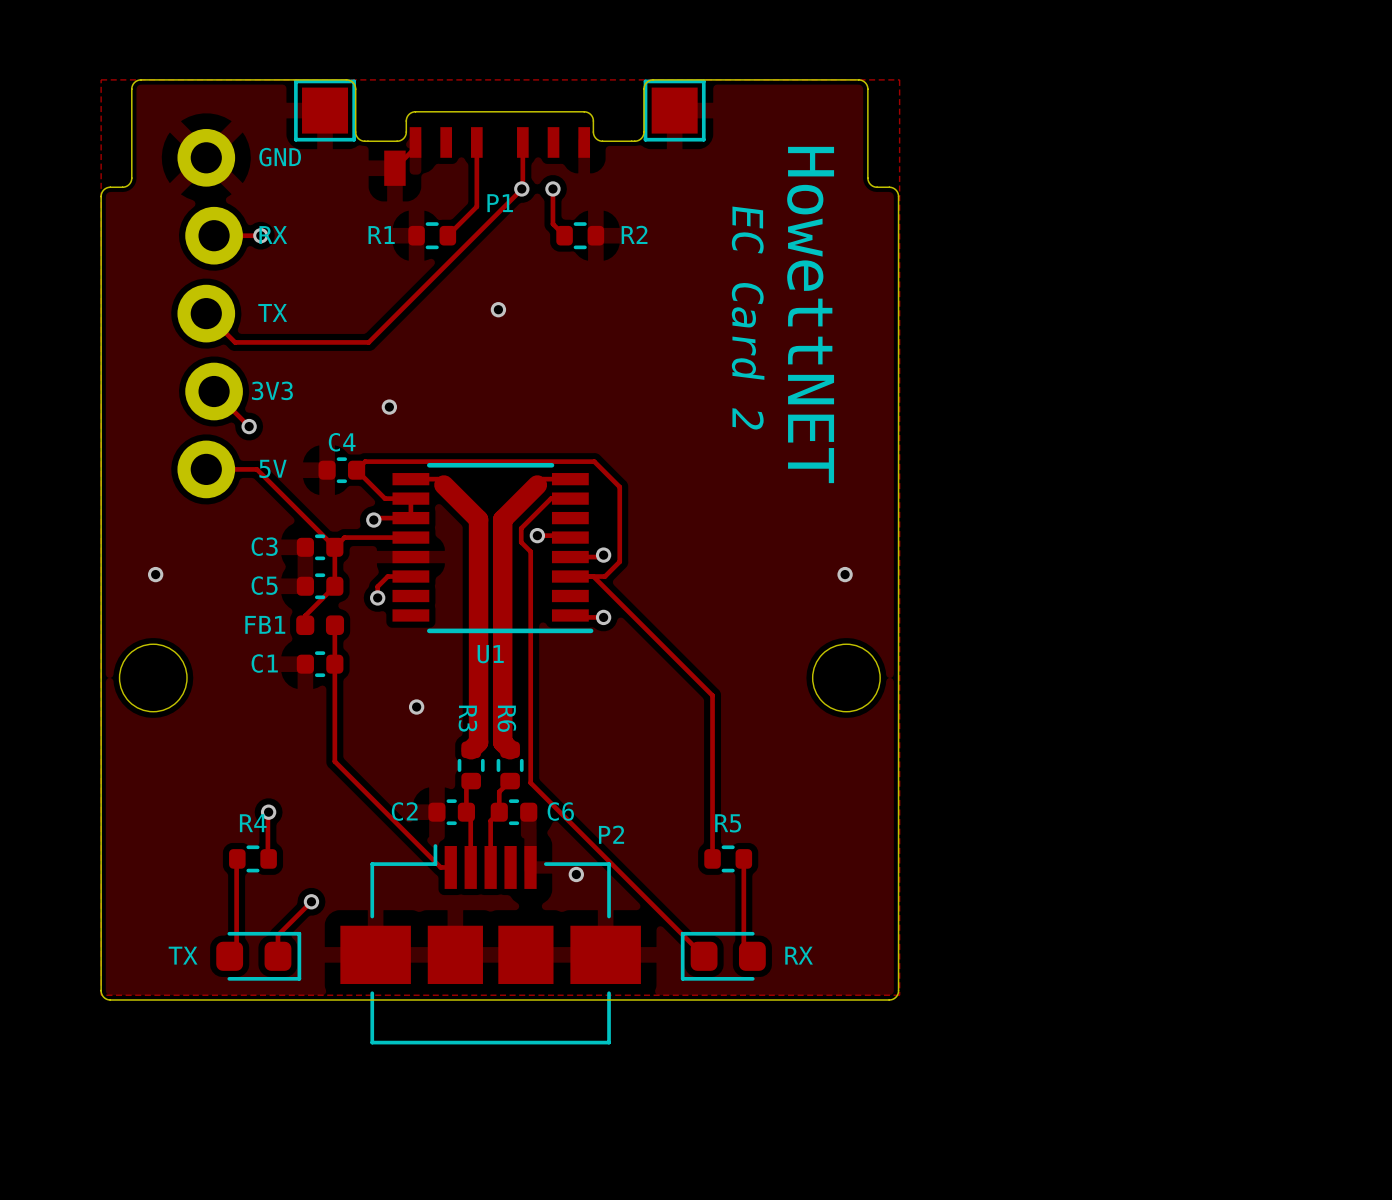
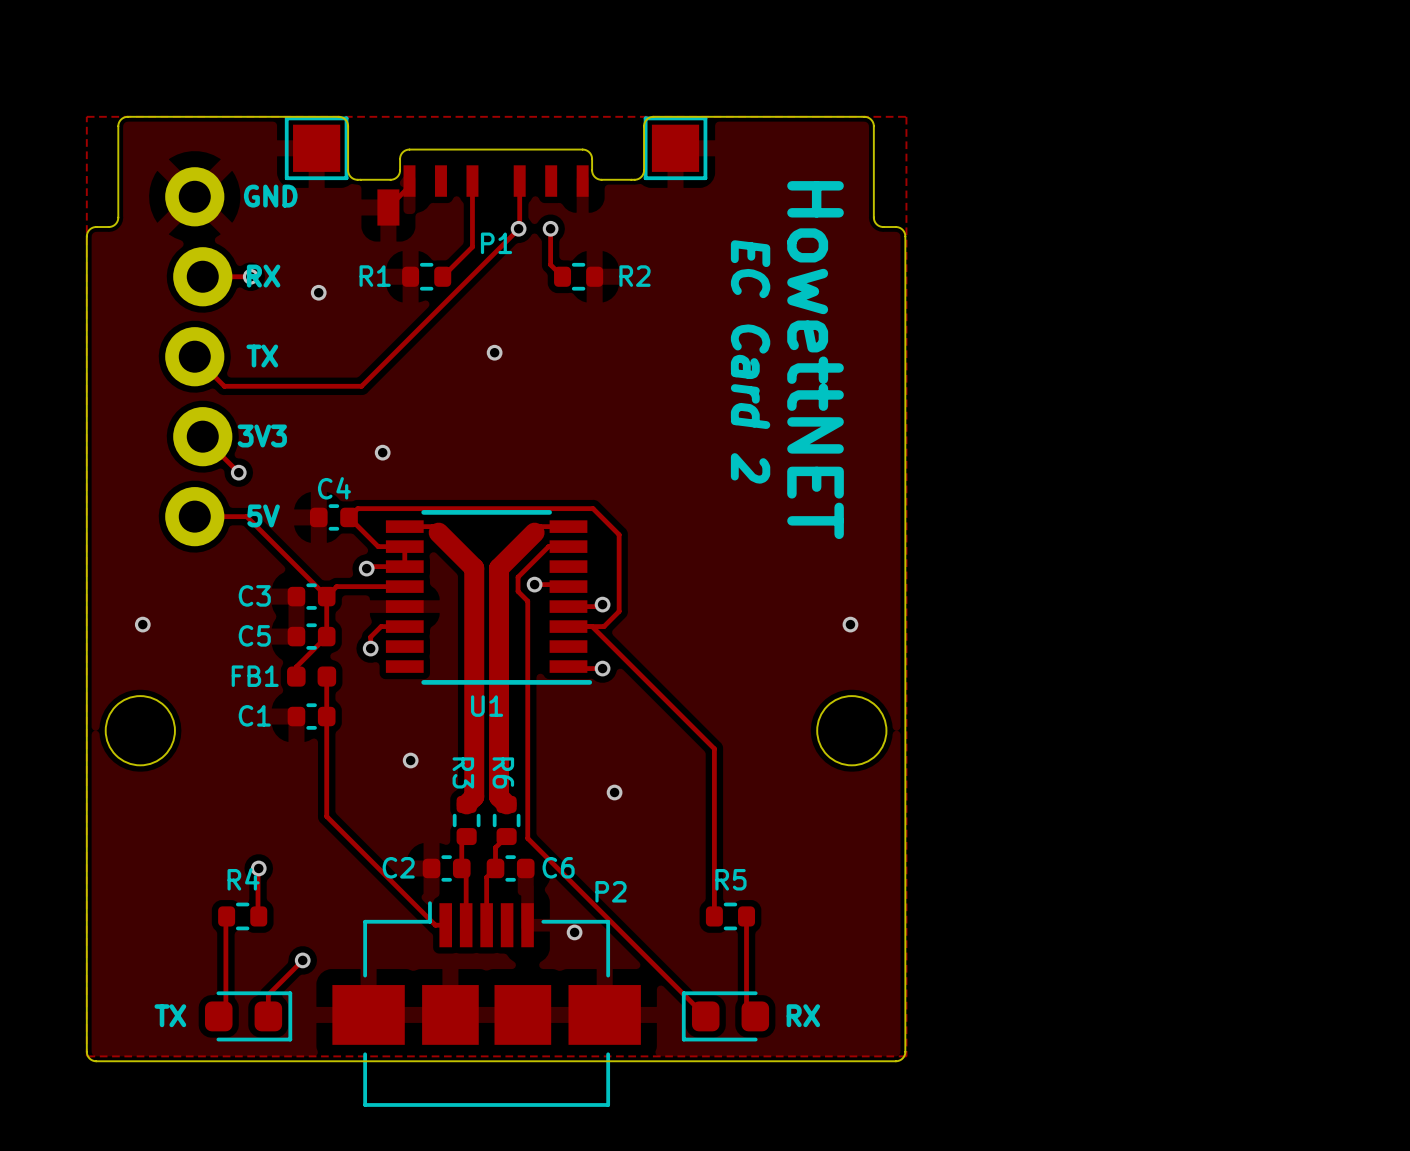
via: none -> (318, 292)
via: none -> (614, 792)

